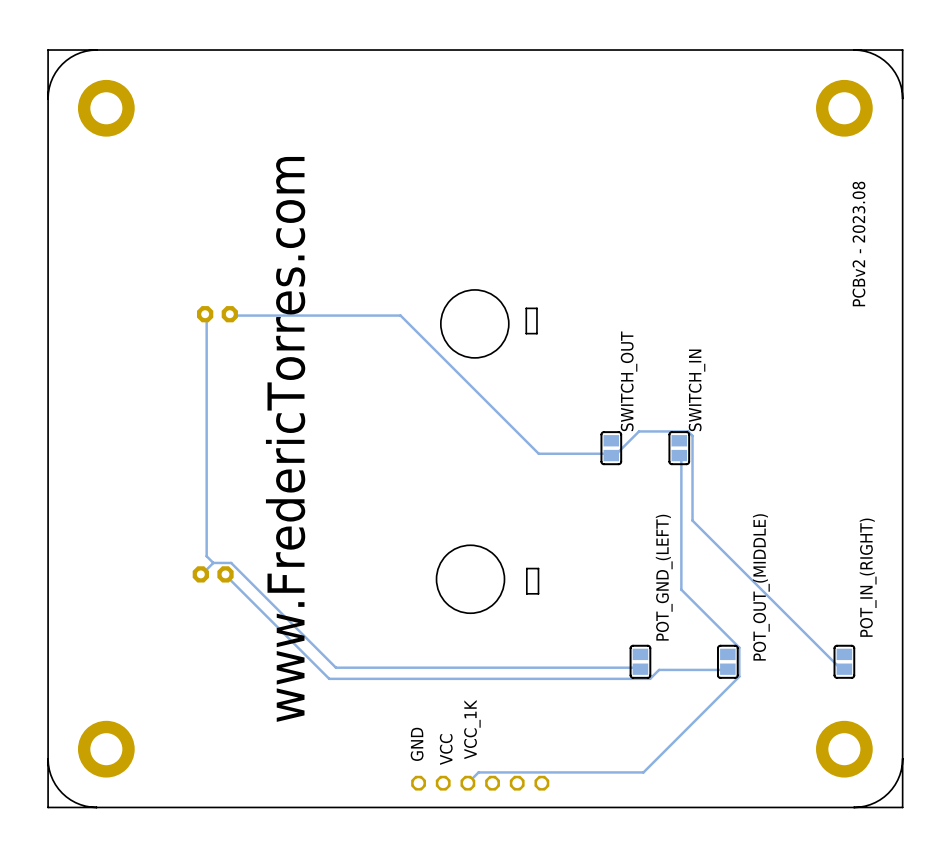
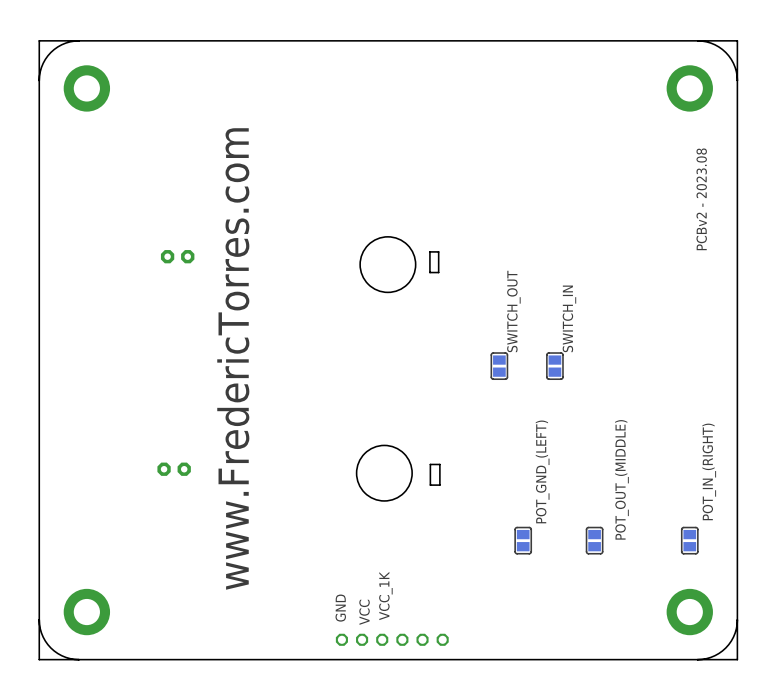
track: (205, 314) (206, 315) (206, 556) (213, 562) -> none
track: (229, 314) (400, 315) (538, 453) (610, 453) (611, 455) (616, 453) (639, 431) (688, 431) (692, 435) (692, 520) (839, 667) (844, 669) -> none
track: (679, 455) (681, 455) (681, 589) (739, 647) (739, 676) (643, 772) (478, 772) (467, 783) -> none
track: (213, 562) (231, 562) (335, 667) (640, 669) -> none
track: (213, 562) (200, 574) -> none
track: (225, 574) (329, 678) (650, 678) (659, 669) (727, 669) -> none

